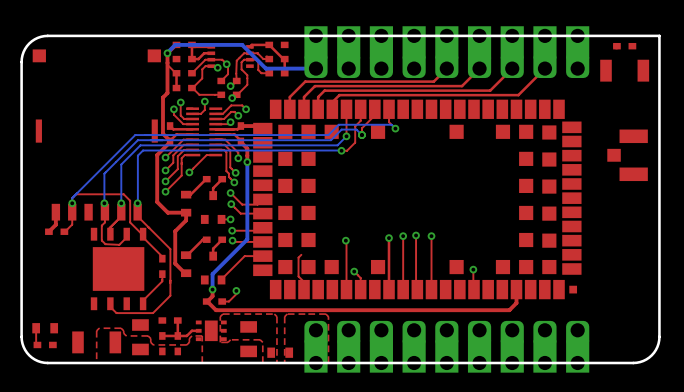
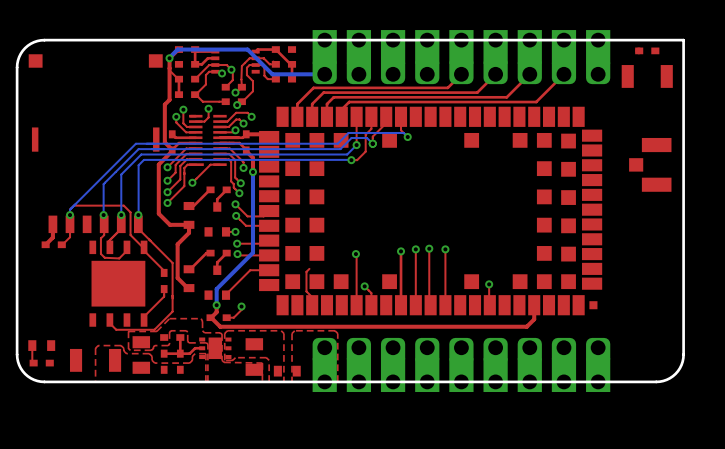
top zone outline: none -> (201, 318) (169, 318) (156, 331) (128, 331) (128, 348) (151, 350) (154, 345) (168, 345) (170, 330) (186, 330) (189, 342) (207, 344) (207, 381) (262, 381) (262, 363) (224, 362) (222, 360) (222, 334) (204, 332) (201, 318)

